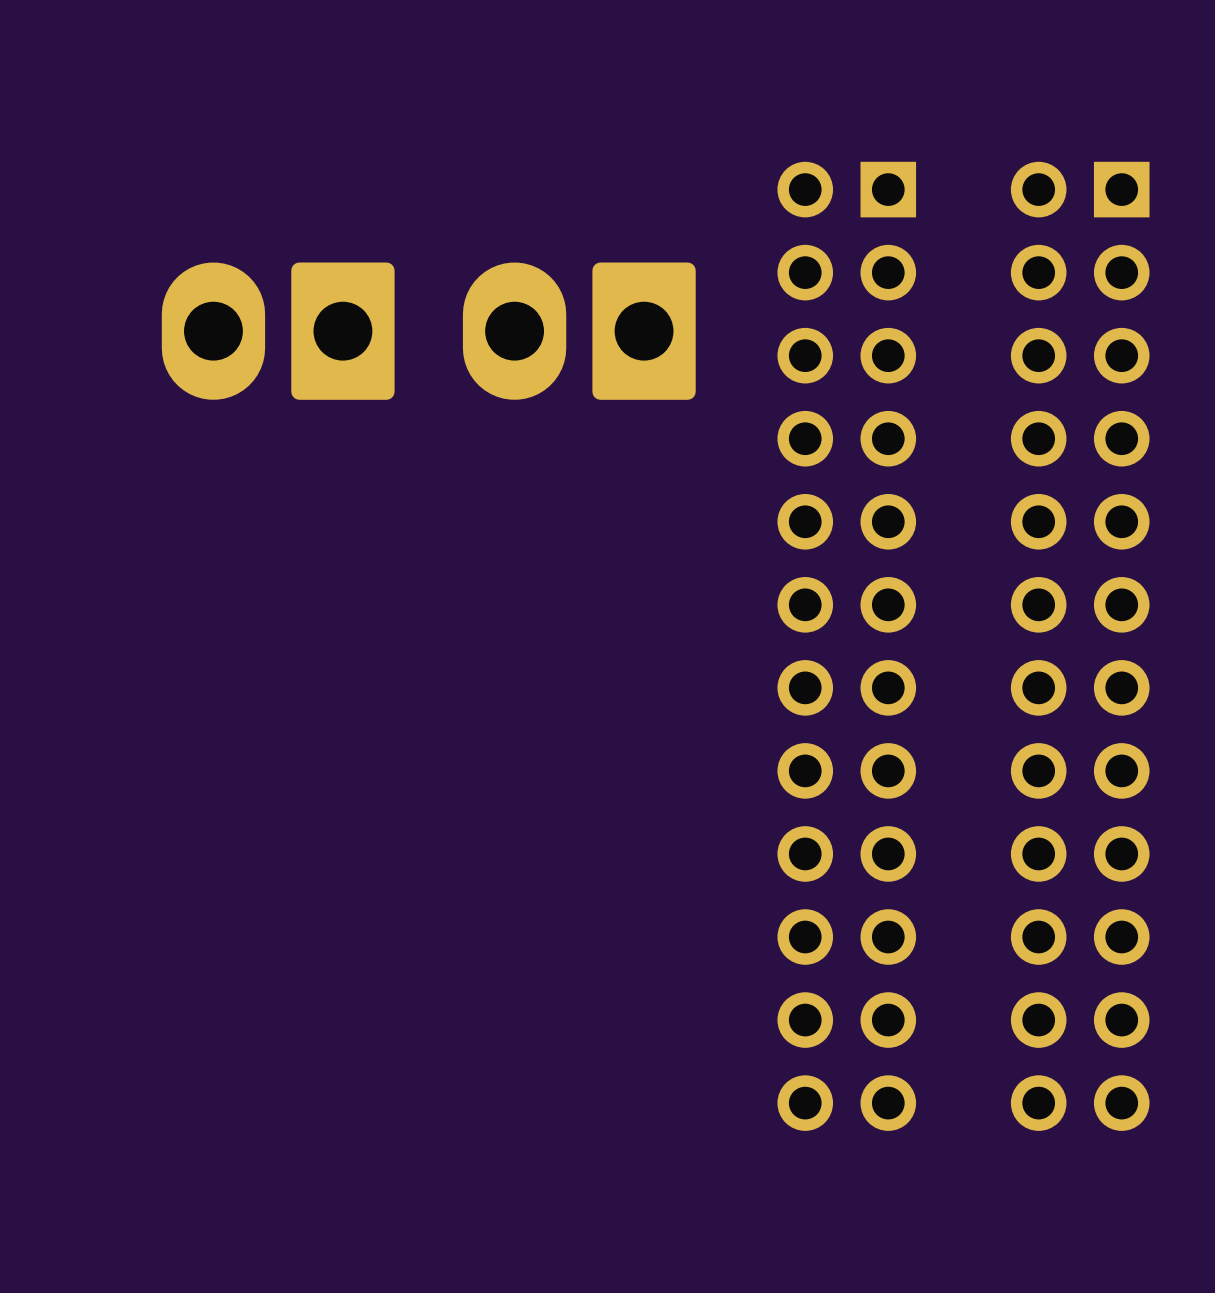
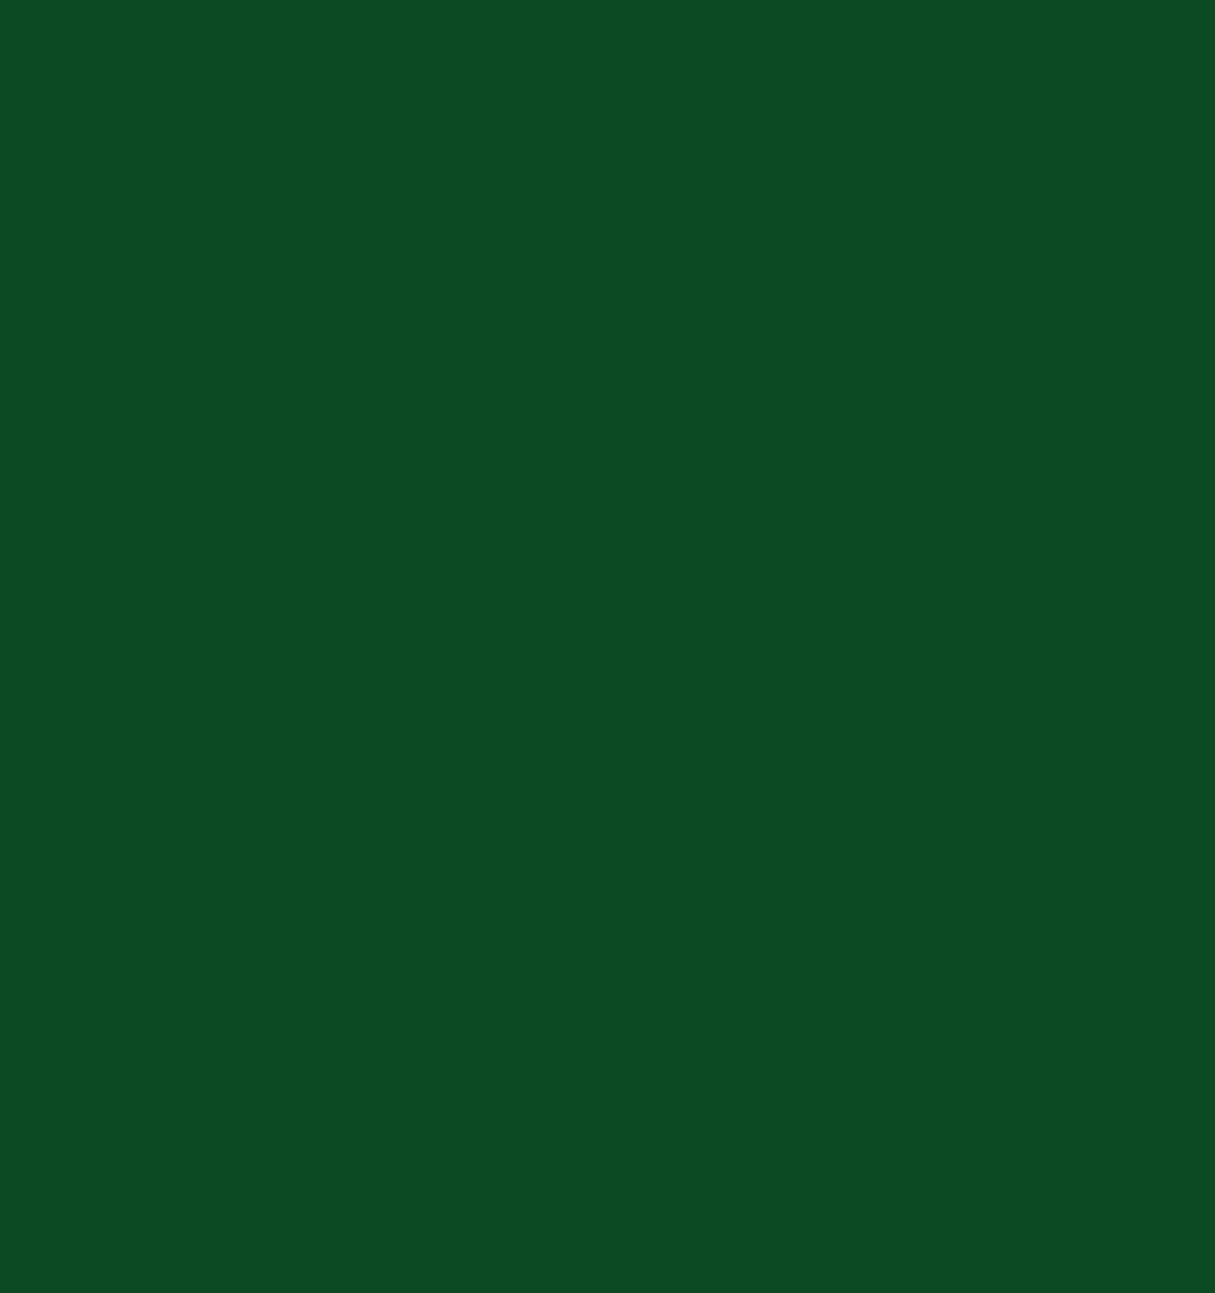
part: (278, 331) -> none
part: (579, 331) -> none
part: (846, 646) -> none
part: (1080, 646) -> none

